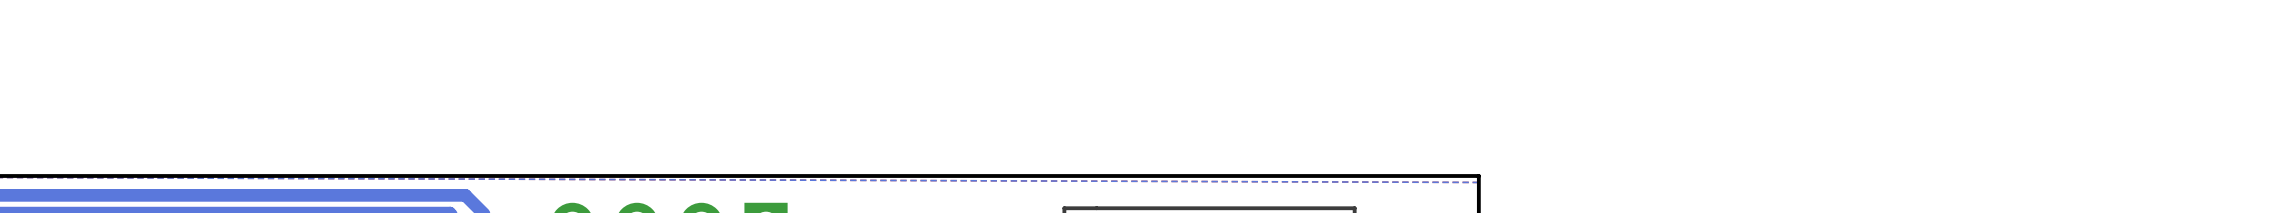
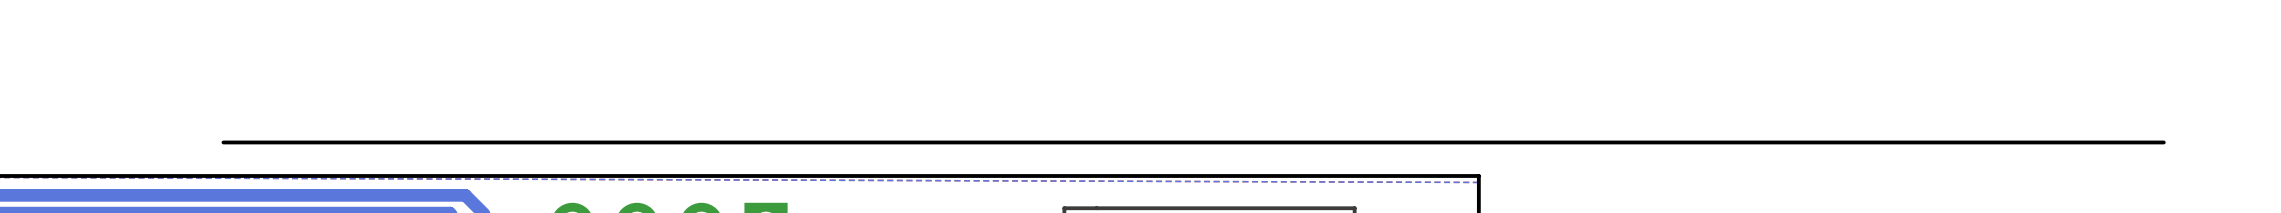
board edge: none -> (2163, 142) (223, 142)

